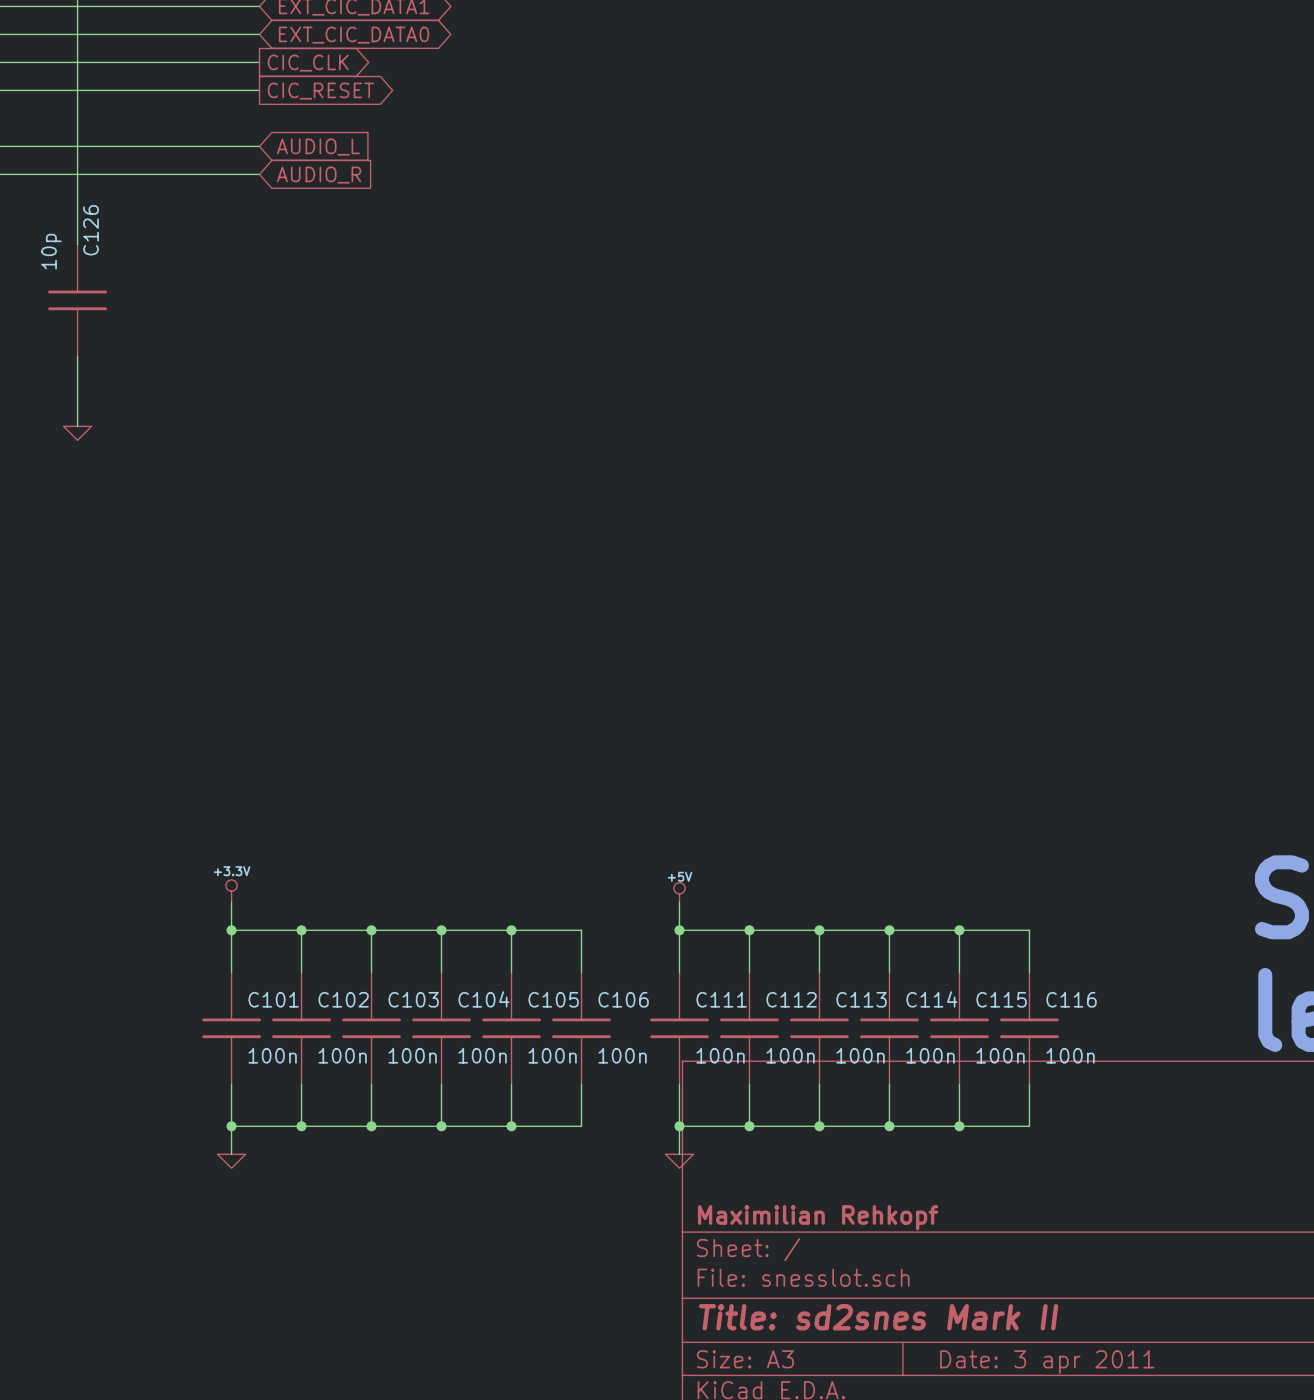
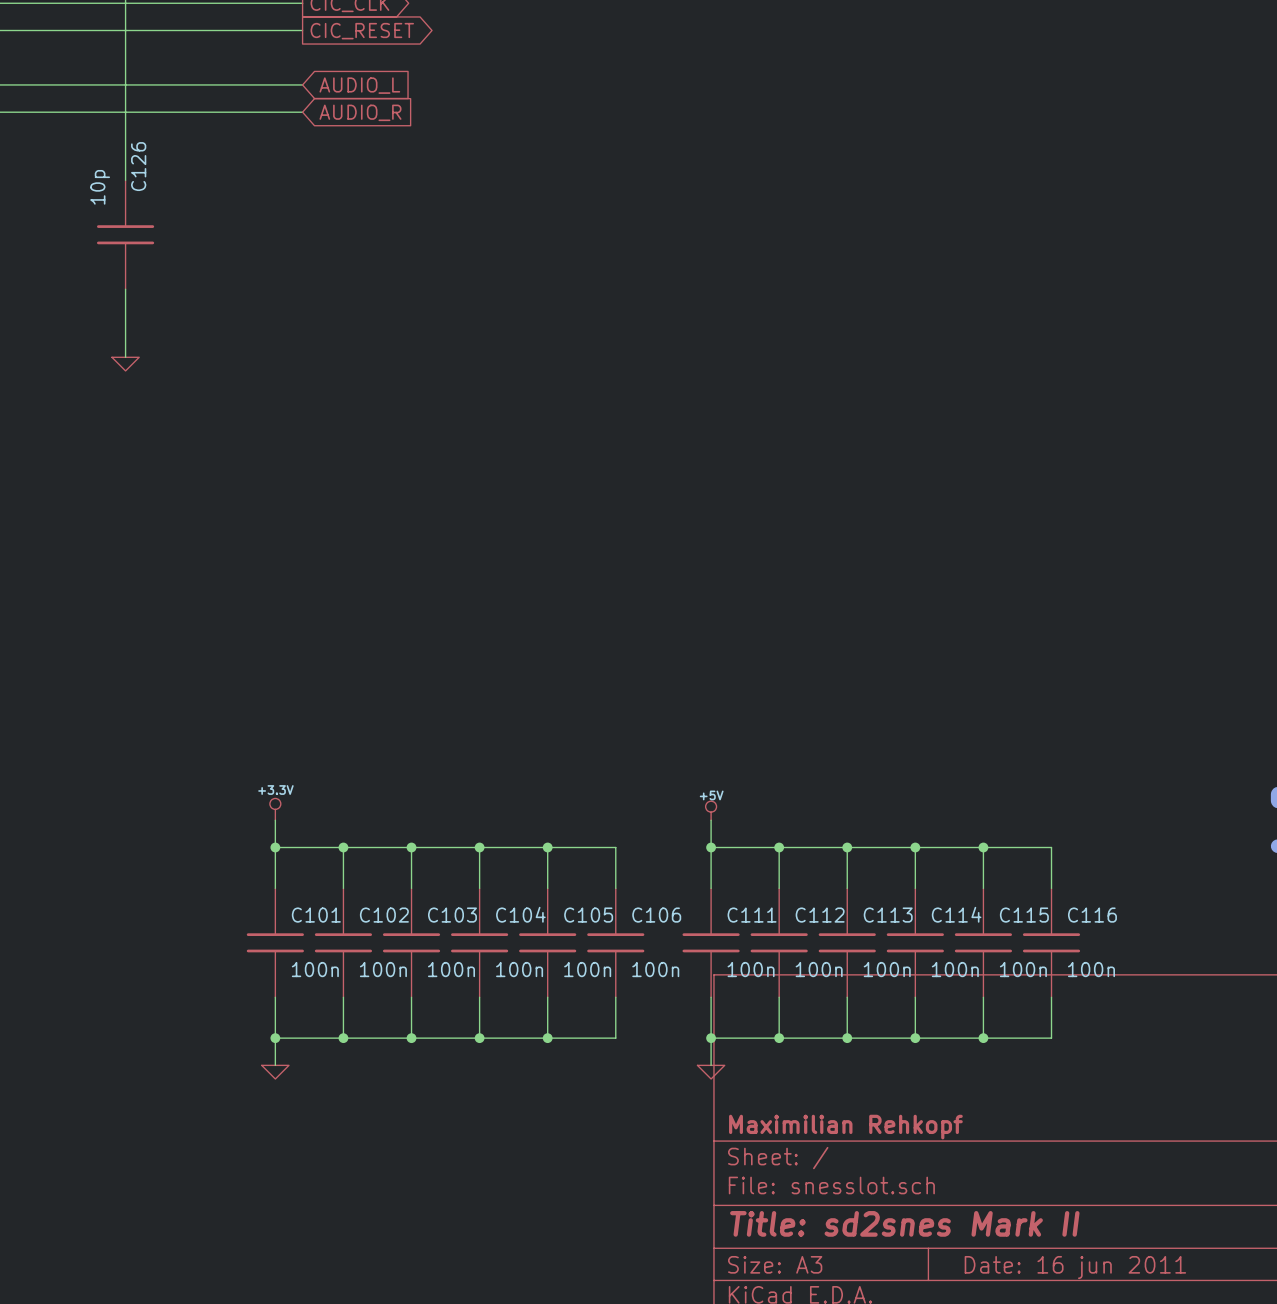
title block: Date: 3 apr 2011 (1047, 1362) -> Date: 16 jun 2011 (1075, 1267)

